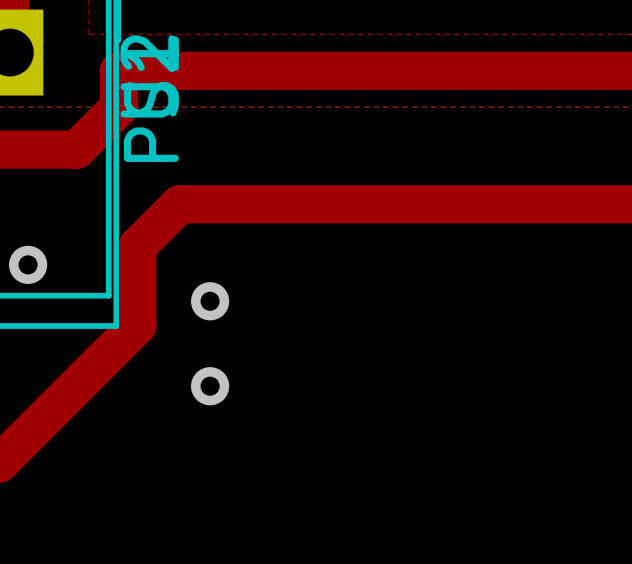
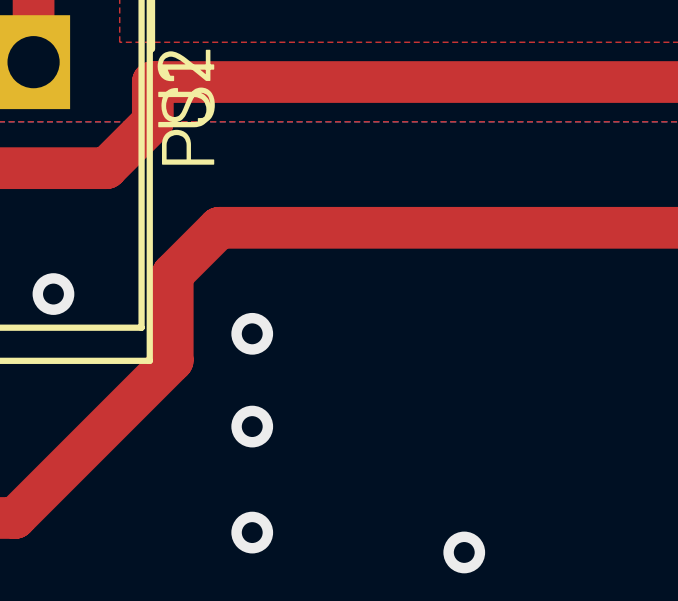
via: none -> (252, 532)
via: none -> (464, 552)

